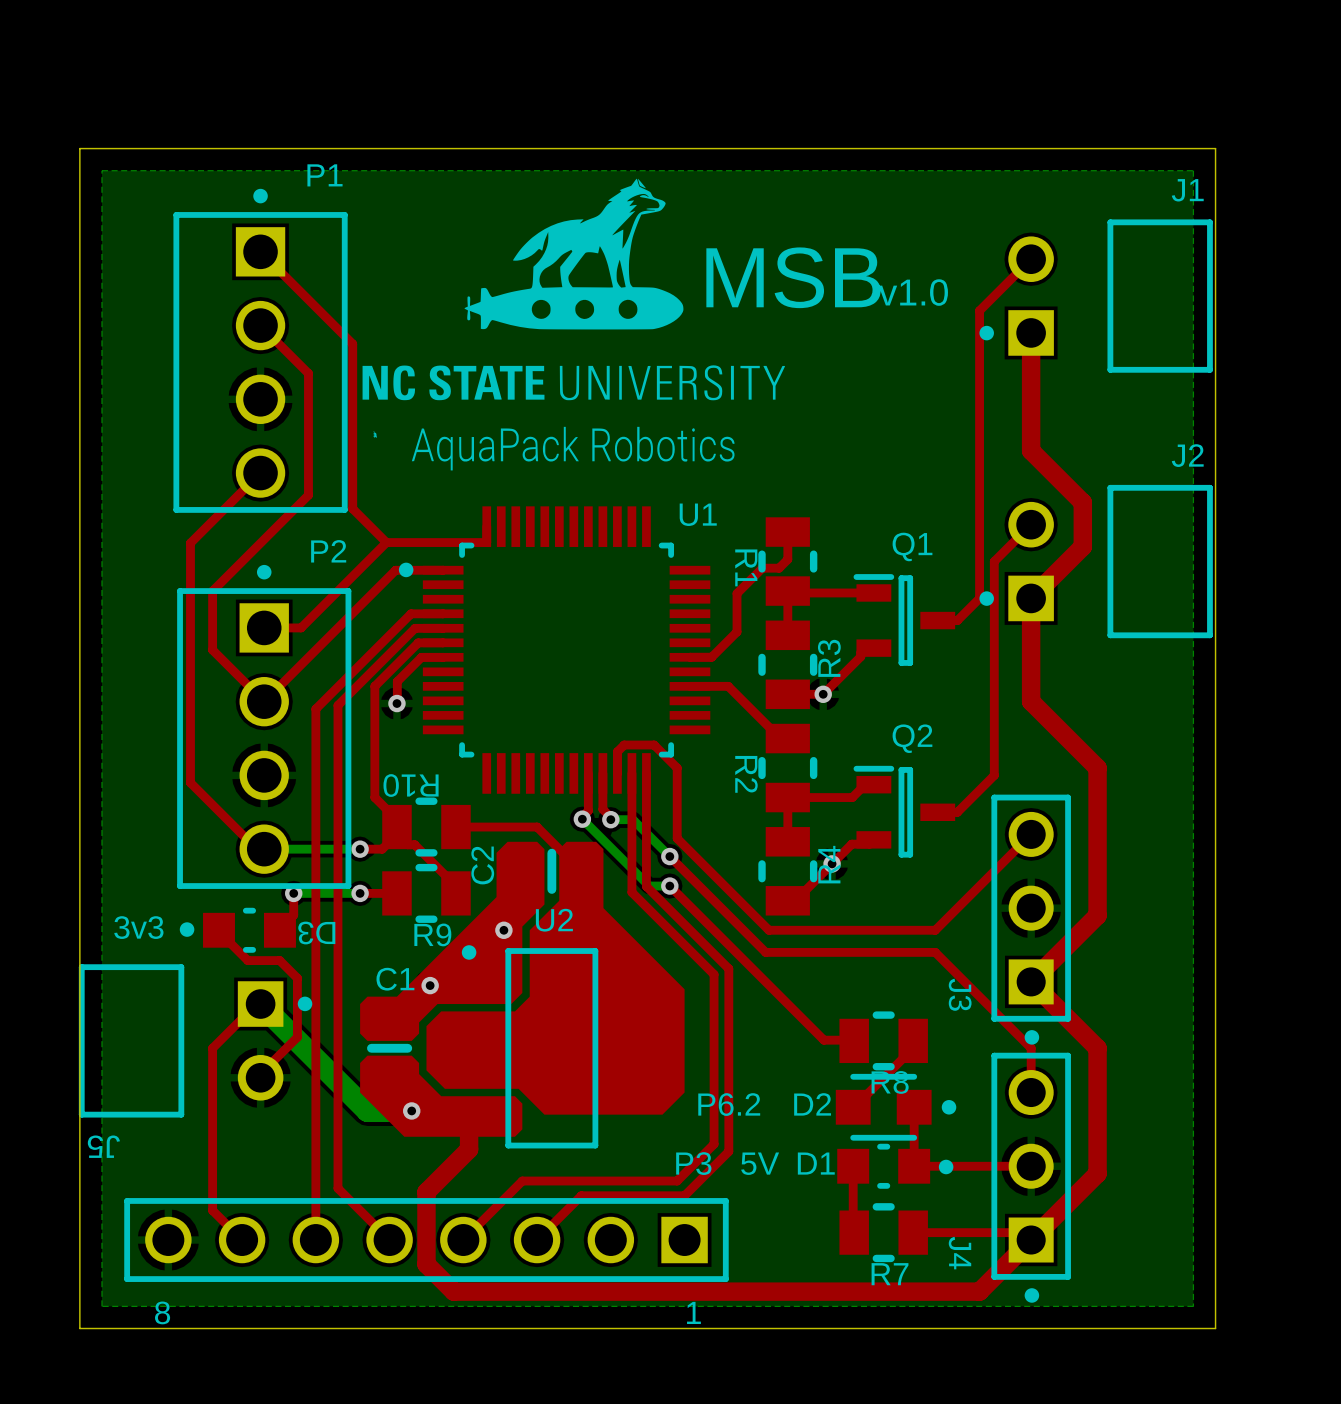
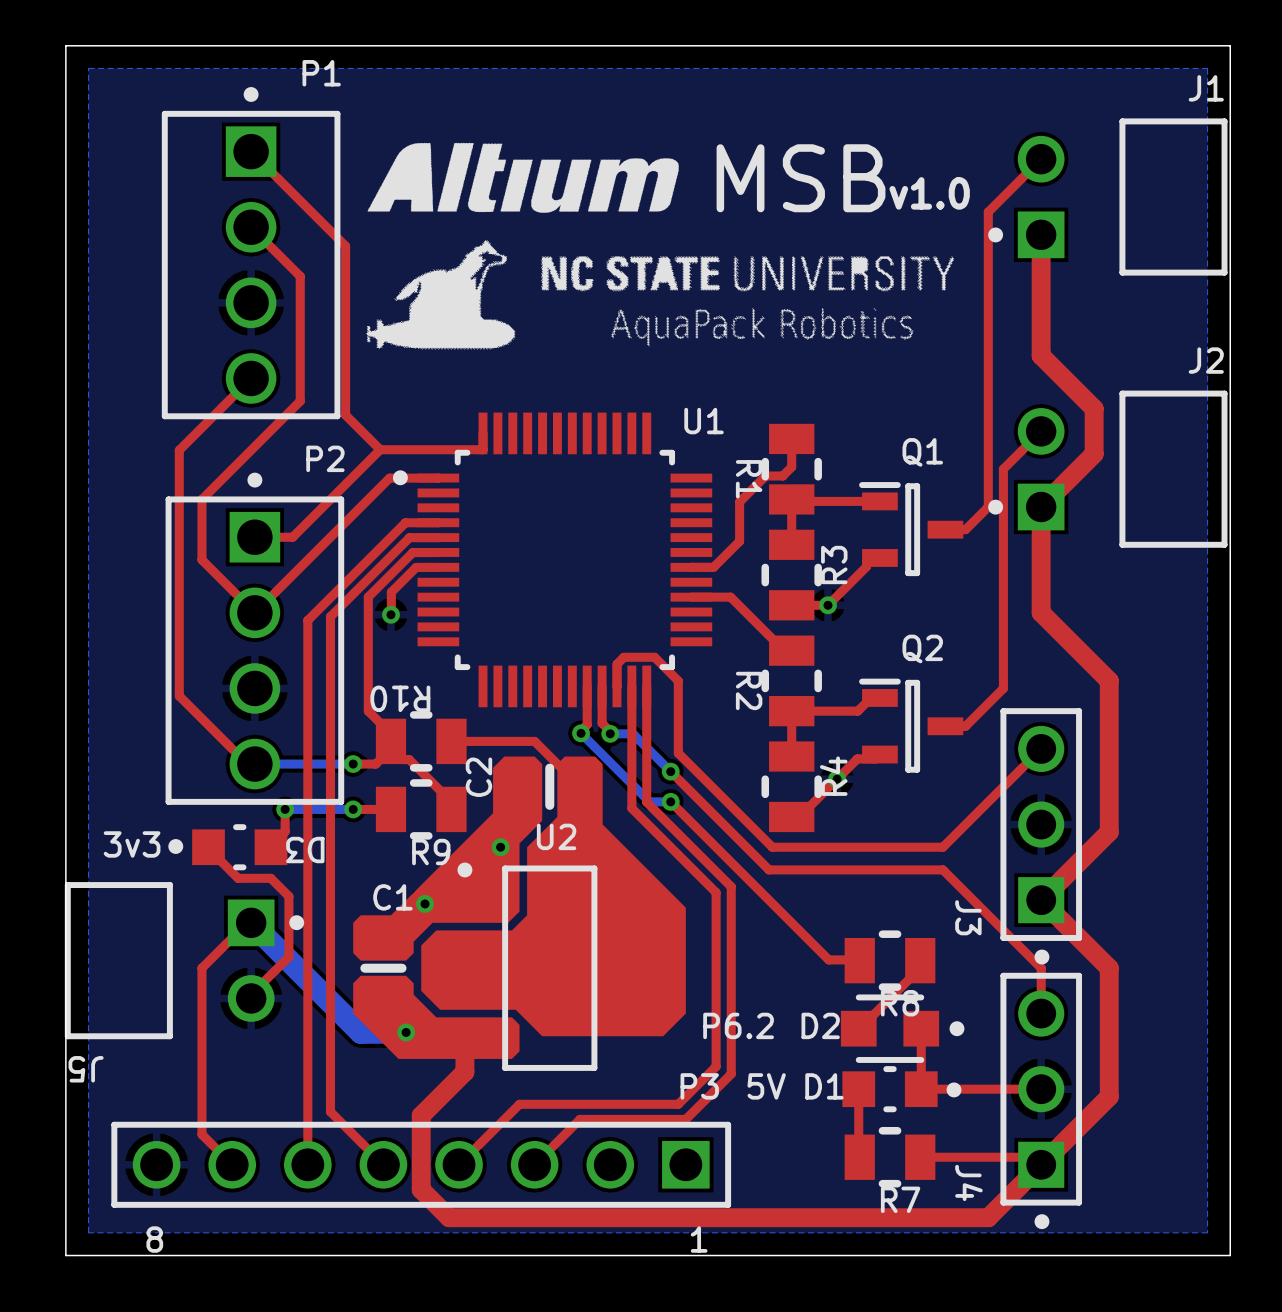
drawing: [362, 178, 786, 471] -> none
drawing: none -> [366, 142, 954, 350]

